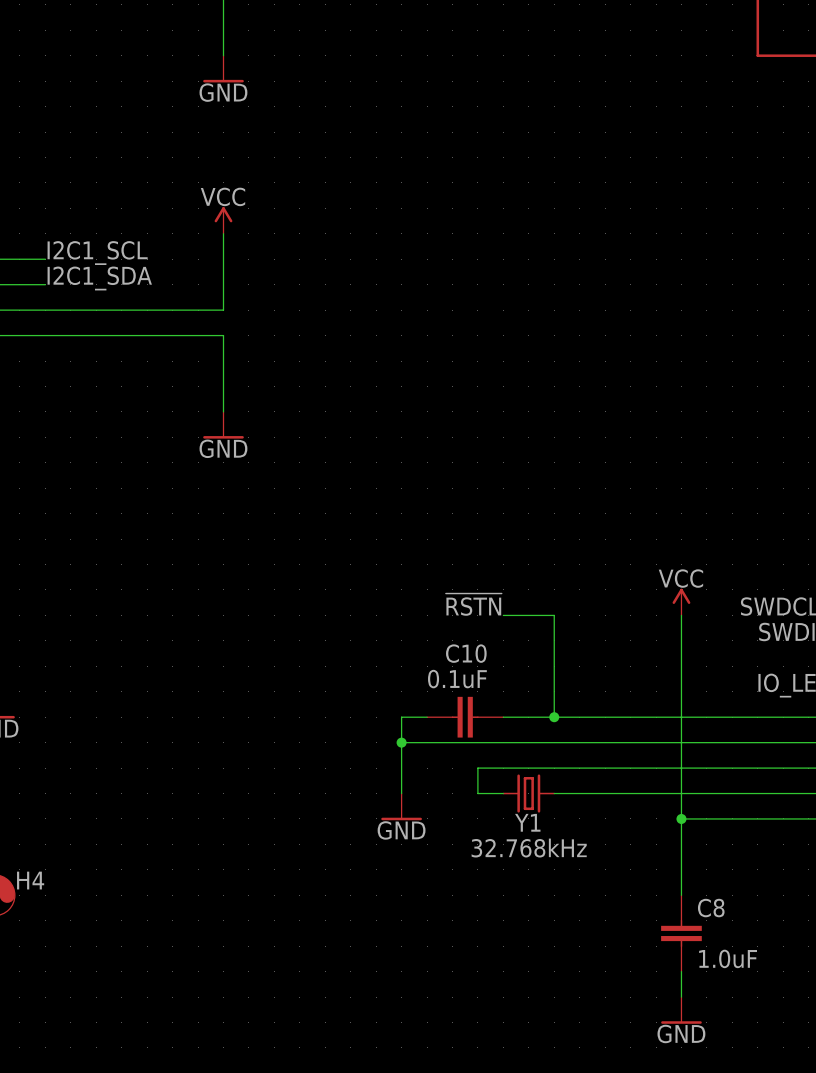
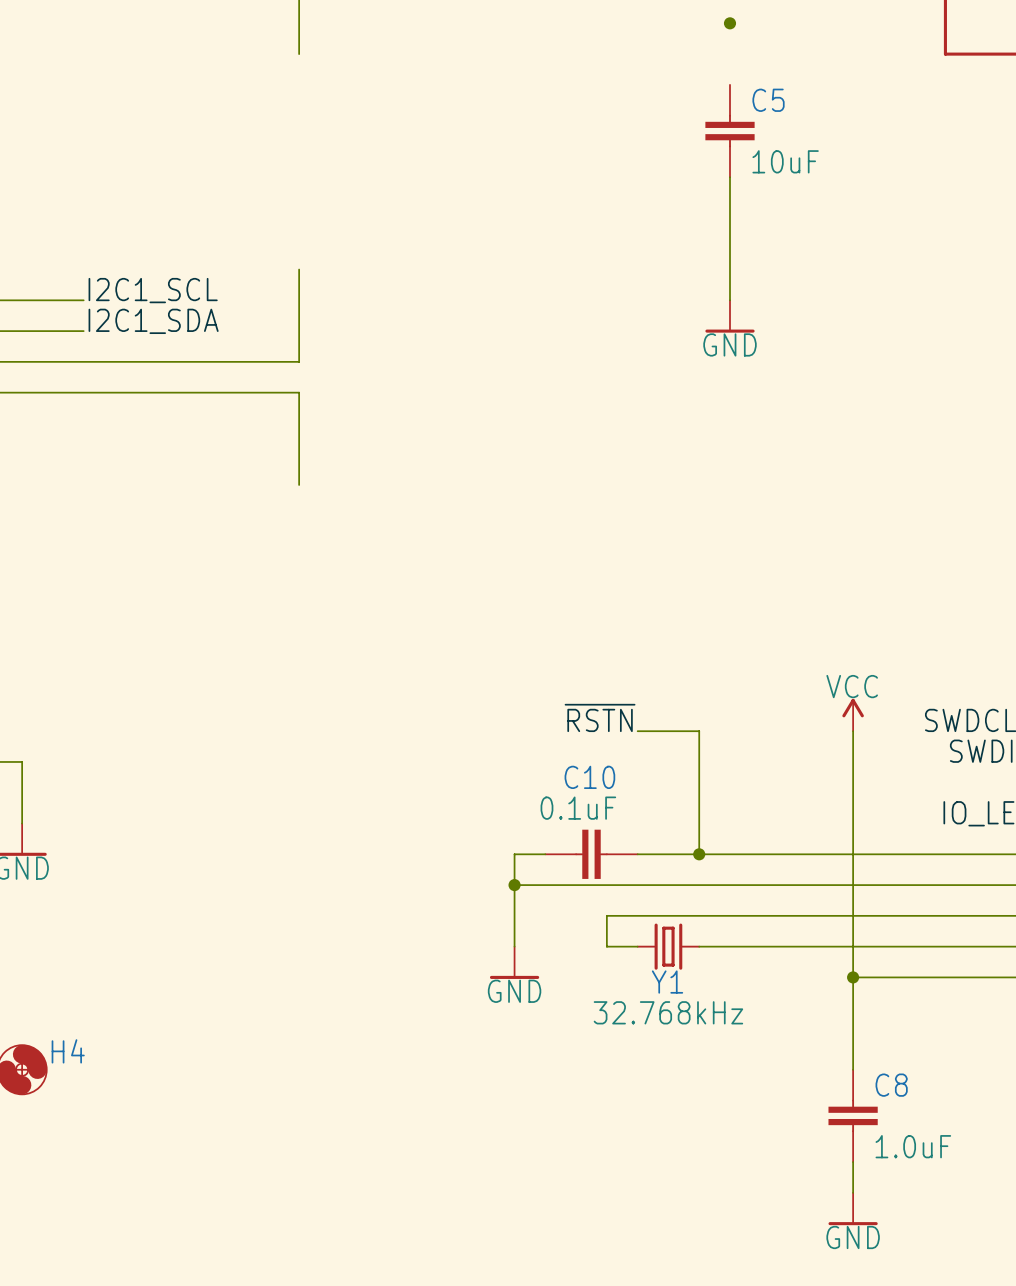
junction: none -> (729, 23)
power symbol: GND (223, 69) -> none
C5: none -> 10uF (729, 131)
wire: none -> (729, 177) (729, 300)
power symbol: VCC (223, 220) -> none
power symbol: none -> GND (729, 316)
power symbol: GND (223, 425) -> none

